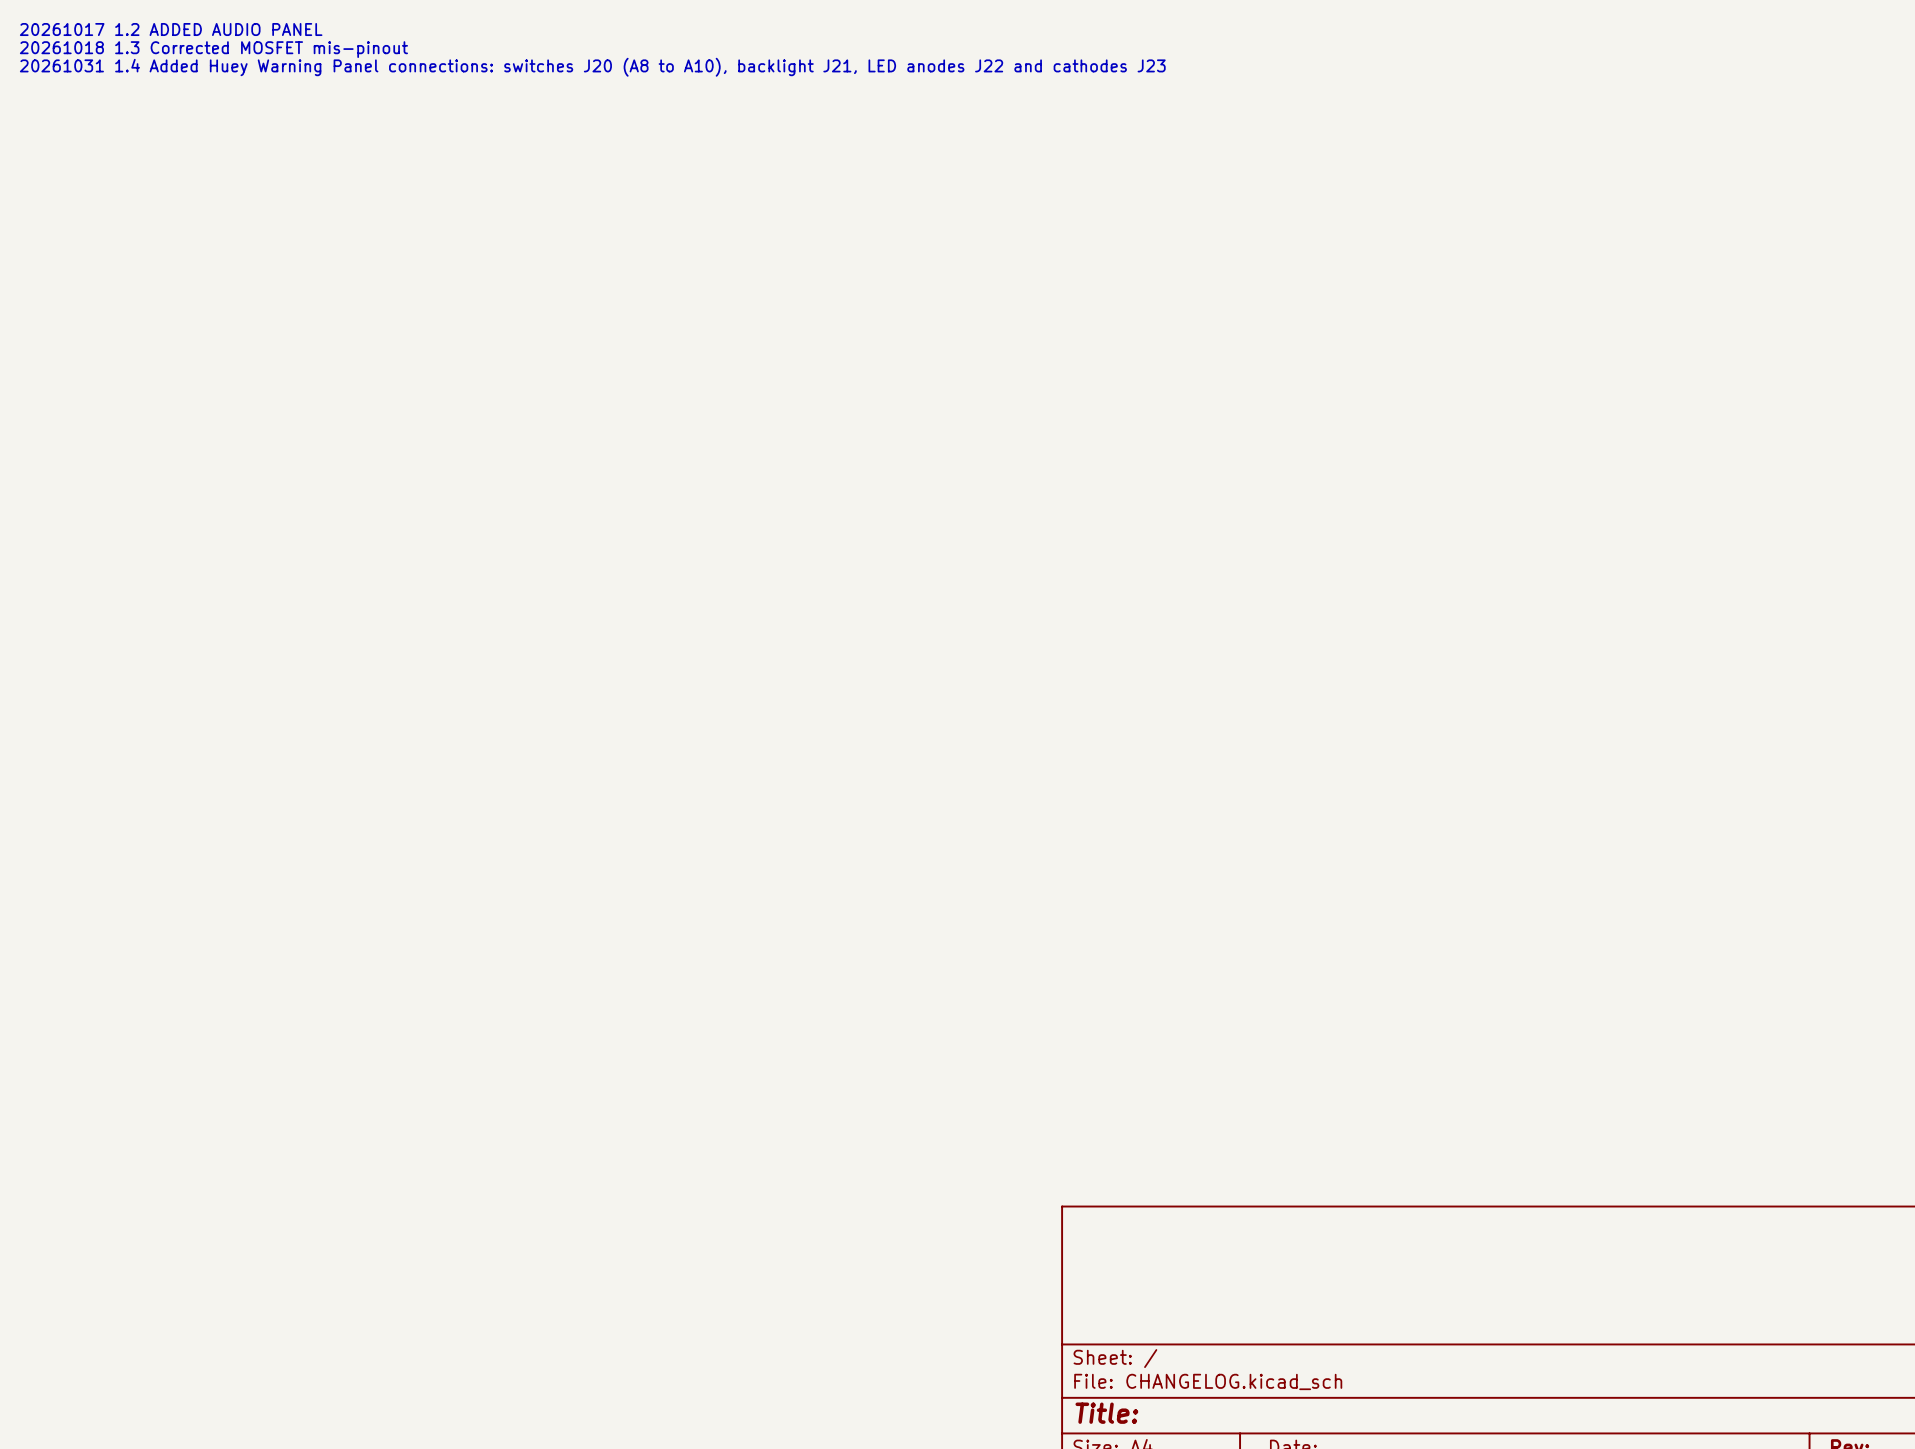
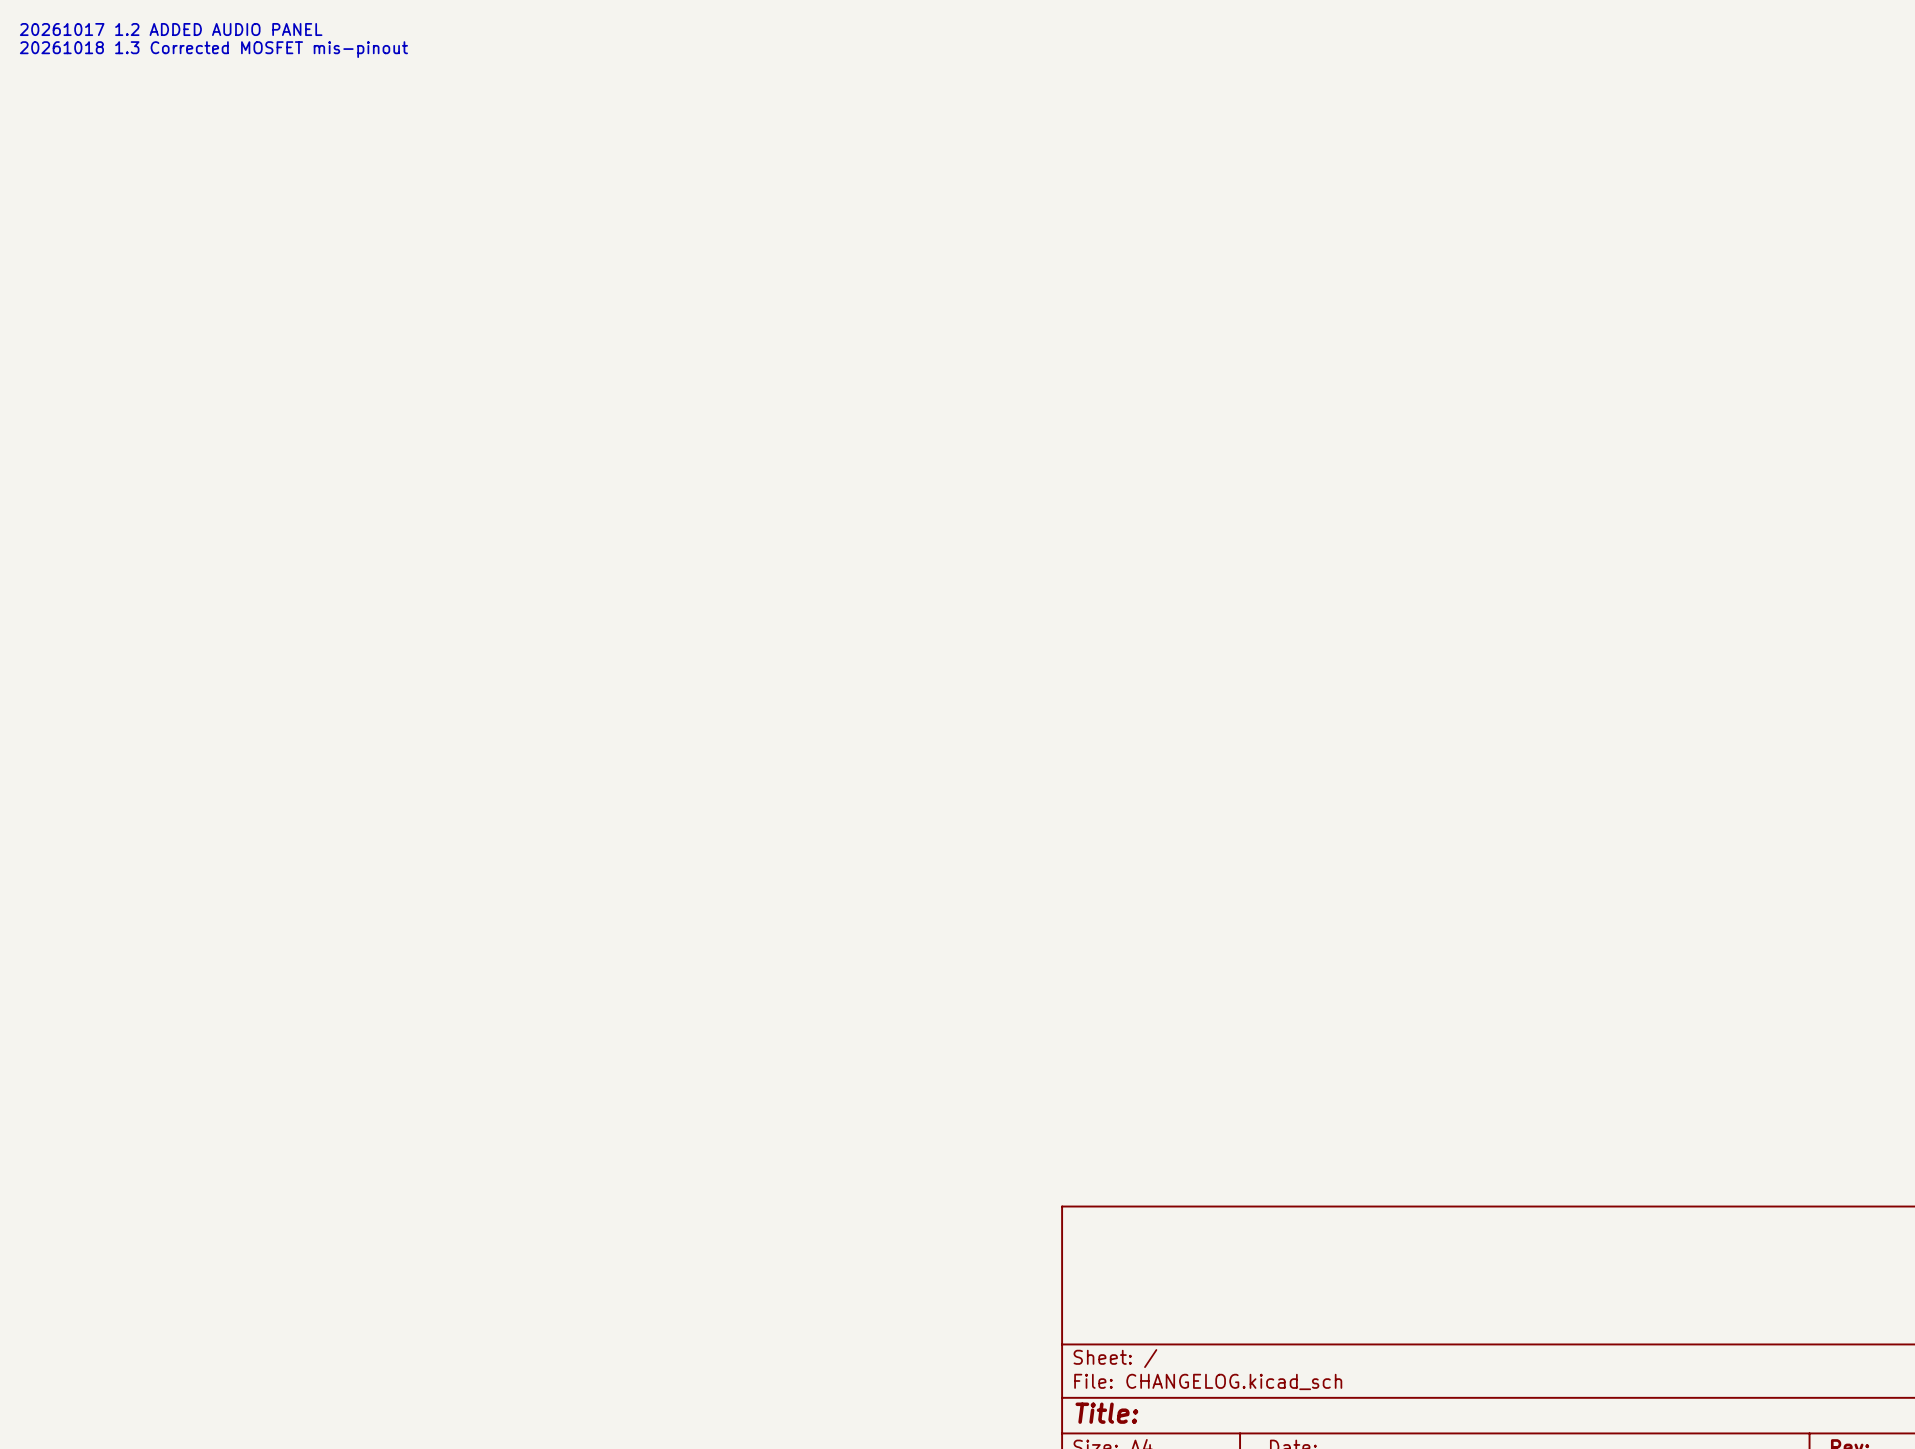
text: 20261031 1.4 Added Huey Warning Panel connections: switches J20 (A8 to A10), backlight J21, LED anodes J22 and cathodes J23 (592, 67) -> none

